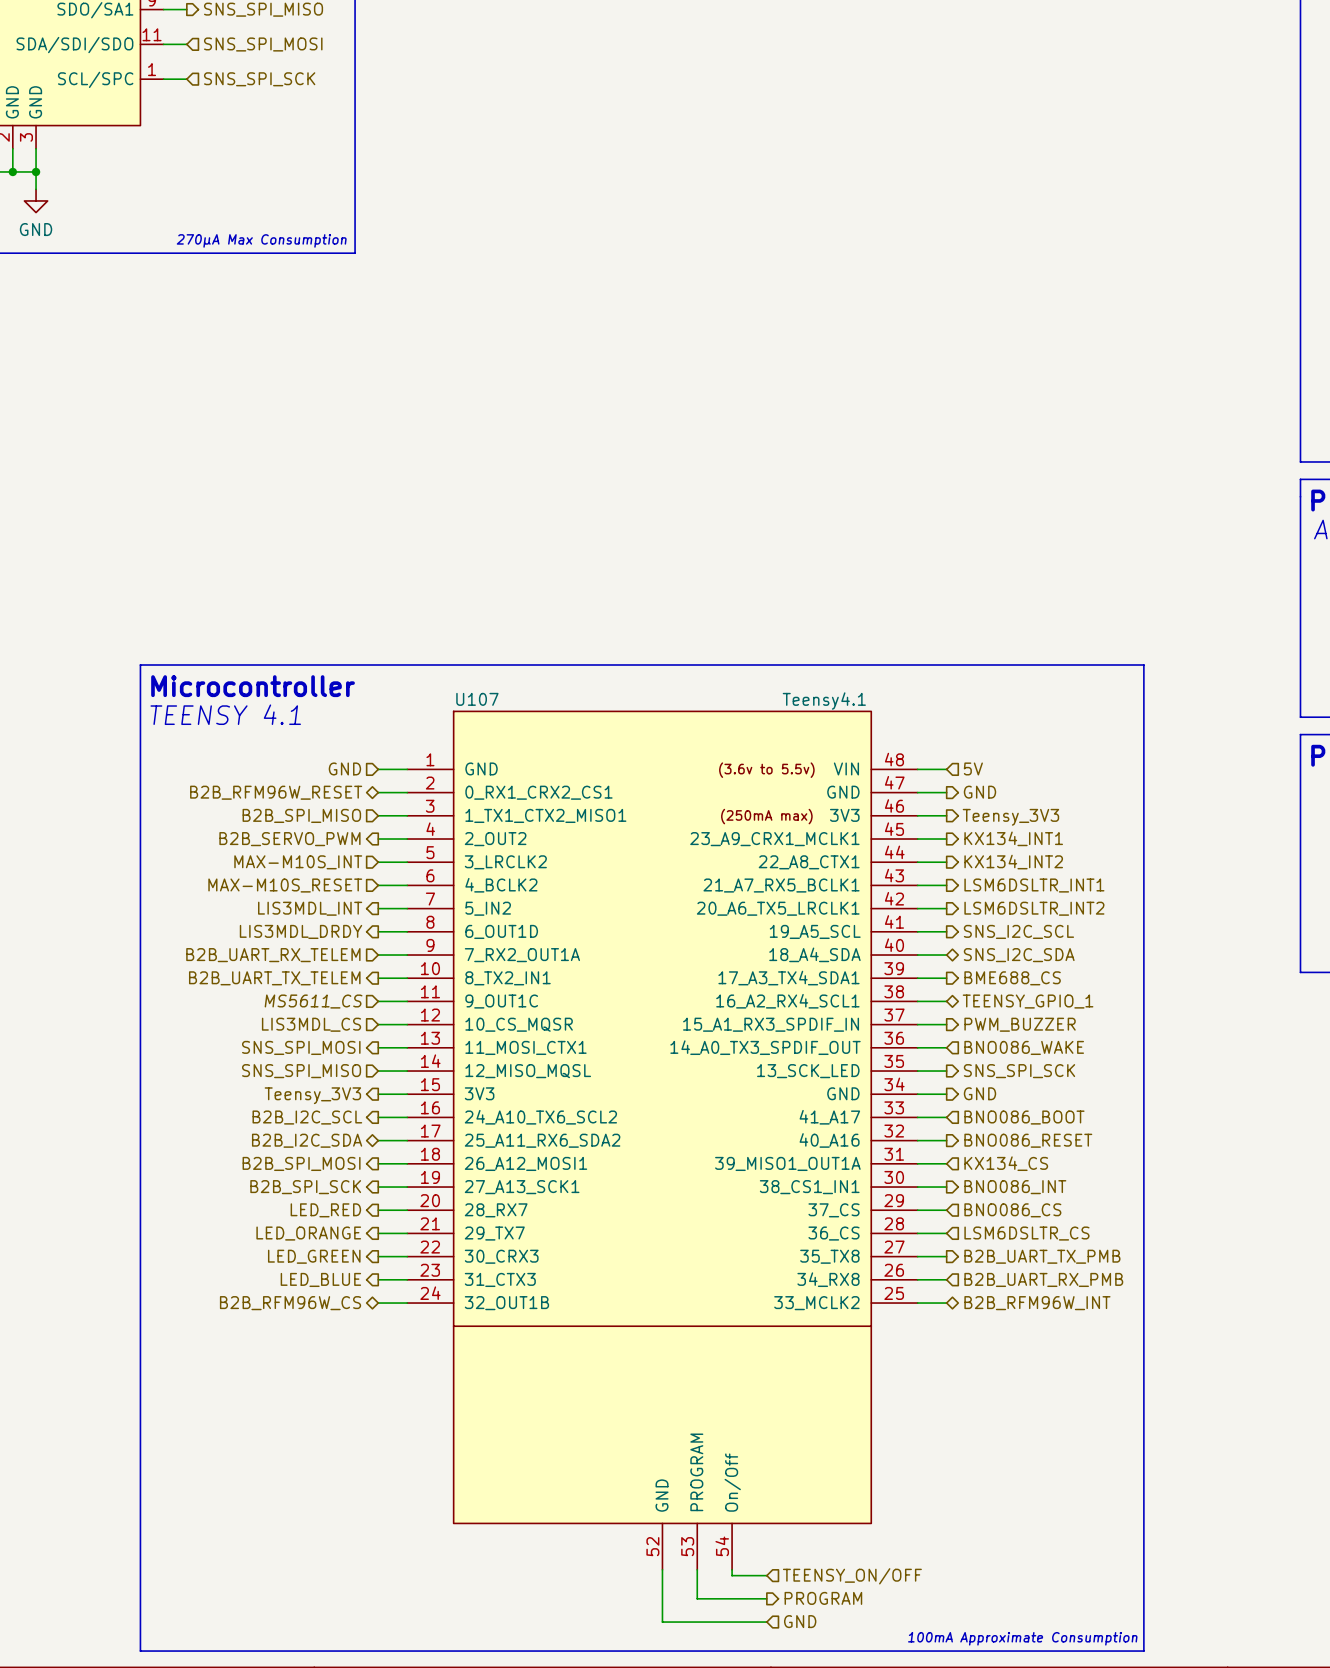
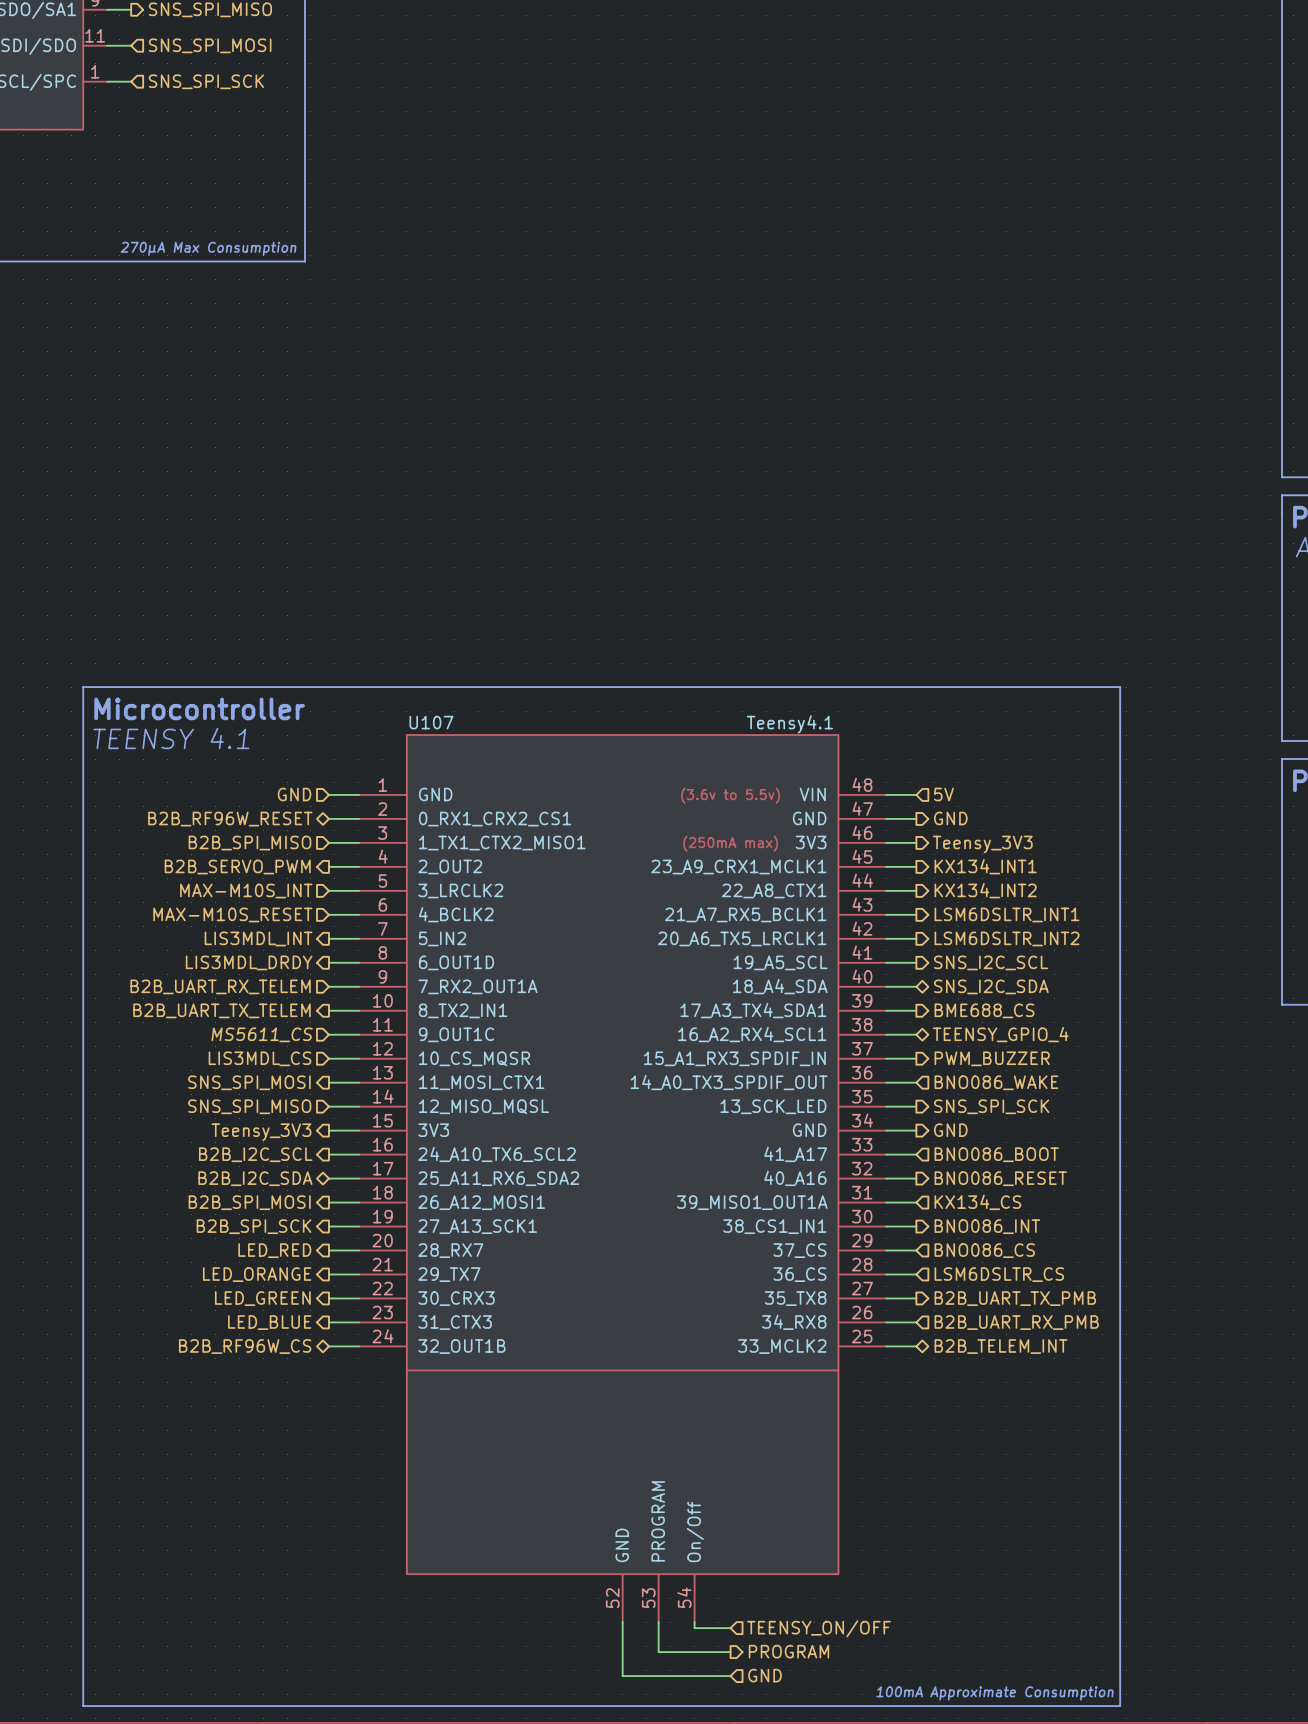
hierarchical label: B2B_RFM96W_RESET (276, 792) -> B2B_RF96W_RESET (230, 819)
hierarchical label: TEENSY_GPIO_1 (1028, 1001) -> TEENSY_GPIO_4 (1000, 1034)
hierarchical label: B2B_RFM96W_CS (290, 1303) -> B2B_RF96W_CS (245, 1346)
hierarchical label: B2B_RFM96W_INT (1037, 1303) -> B2B_TELEM_INT (1001, 1346)

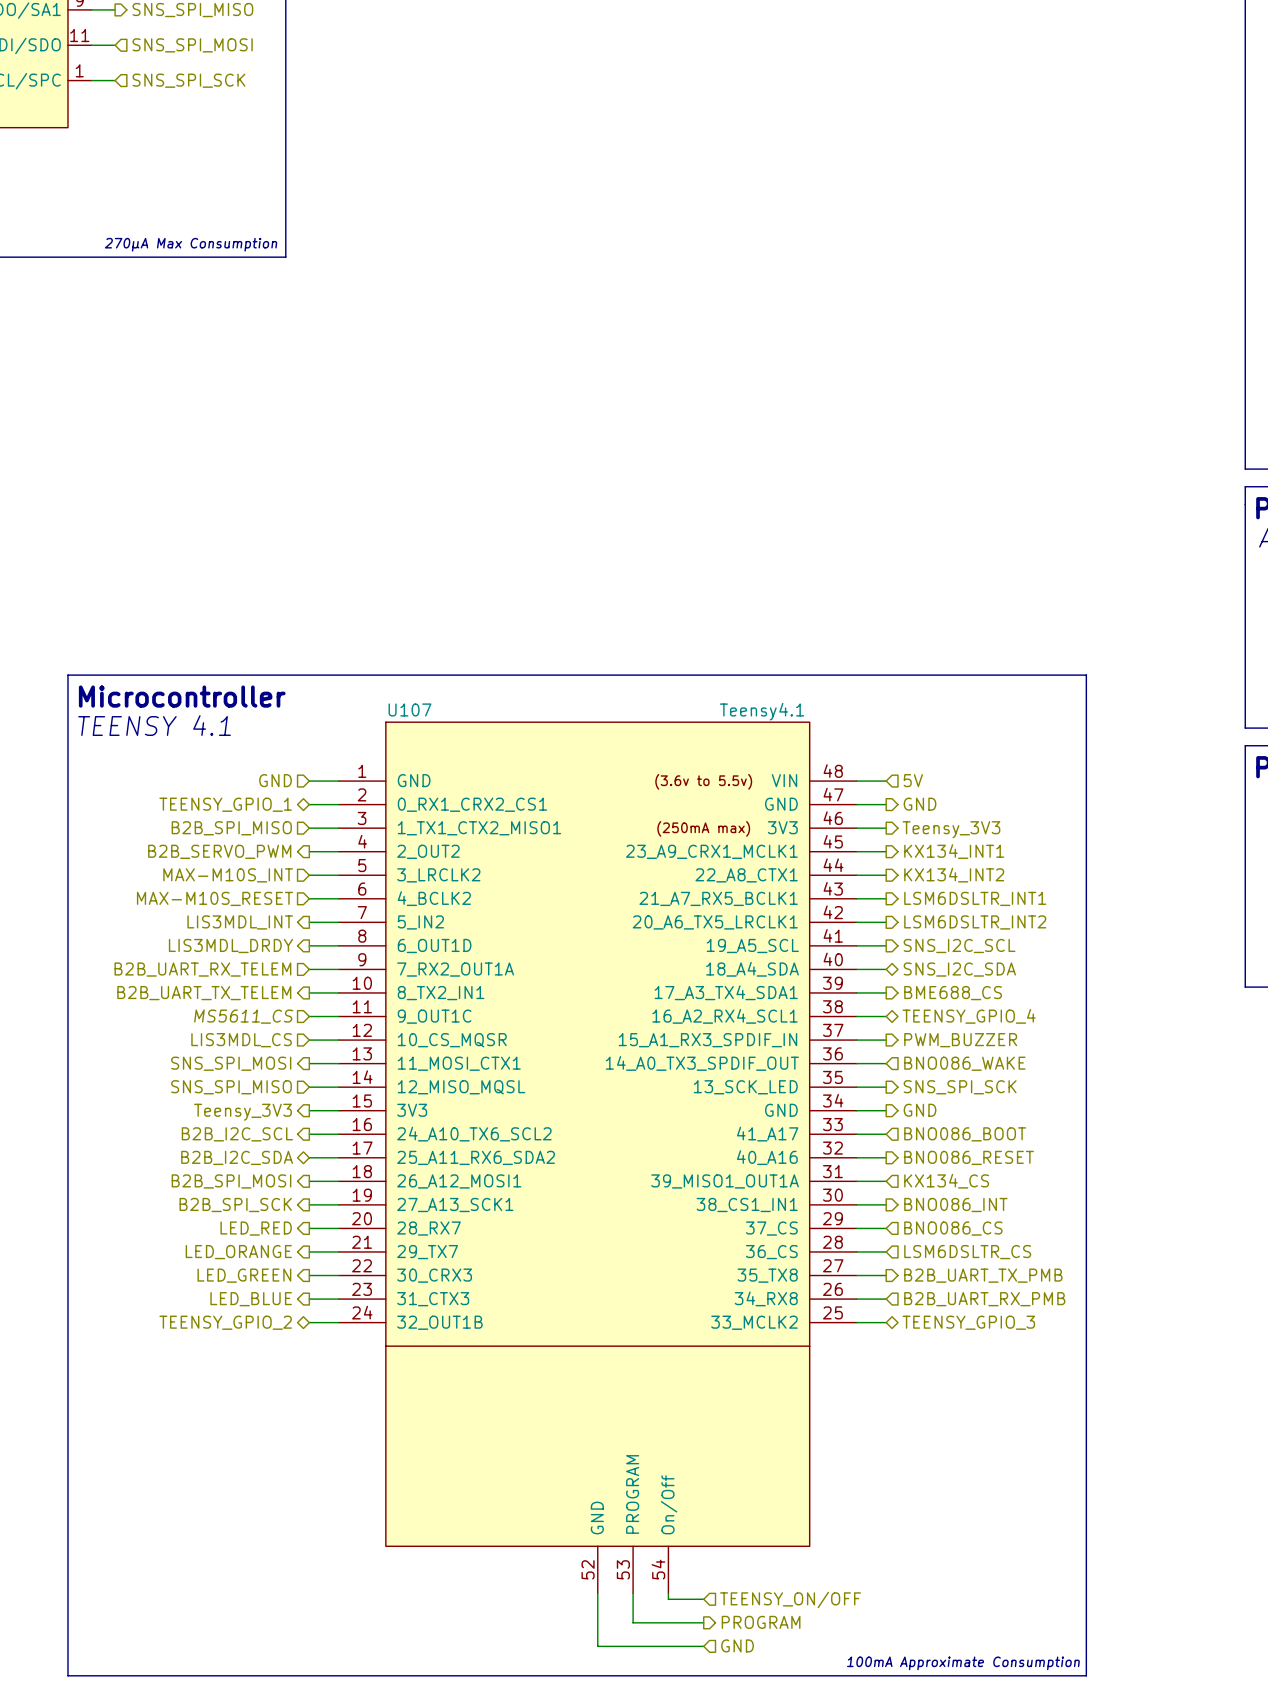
hierarchical label: B2B_RF96W_RESET (230, 819) -> TEENSY_GPIO_1 (225, 804)
hierarchical label: B2B_RF96W_CS (245, 1346) -> TEENSY_GPIO_2 (225, 1322)
hierarchical label: B2B_TELEM_INT (1001, 1346) -> TEENSY_GPIO_3 (968, 1322)

